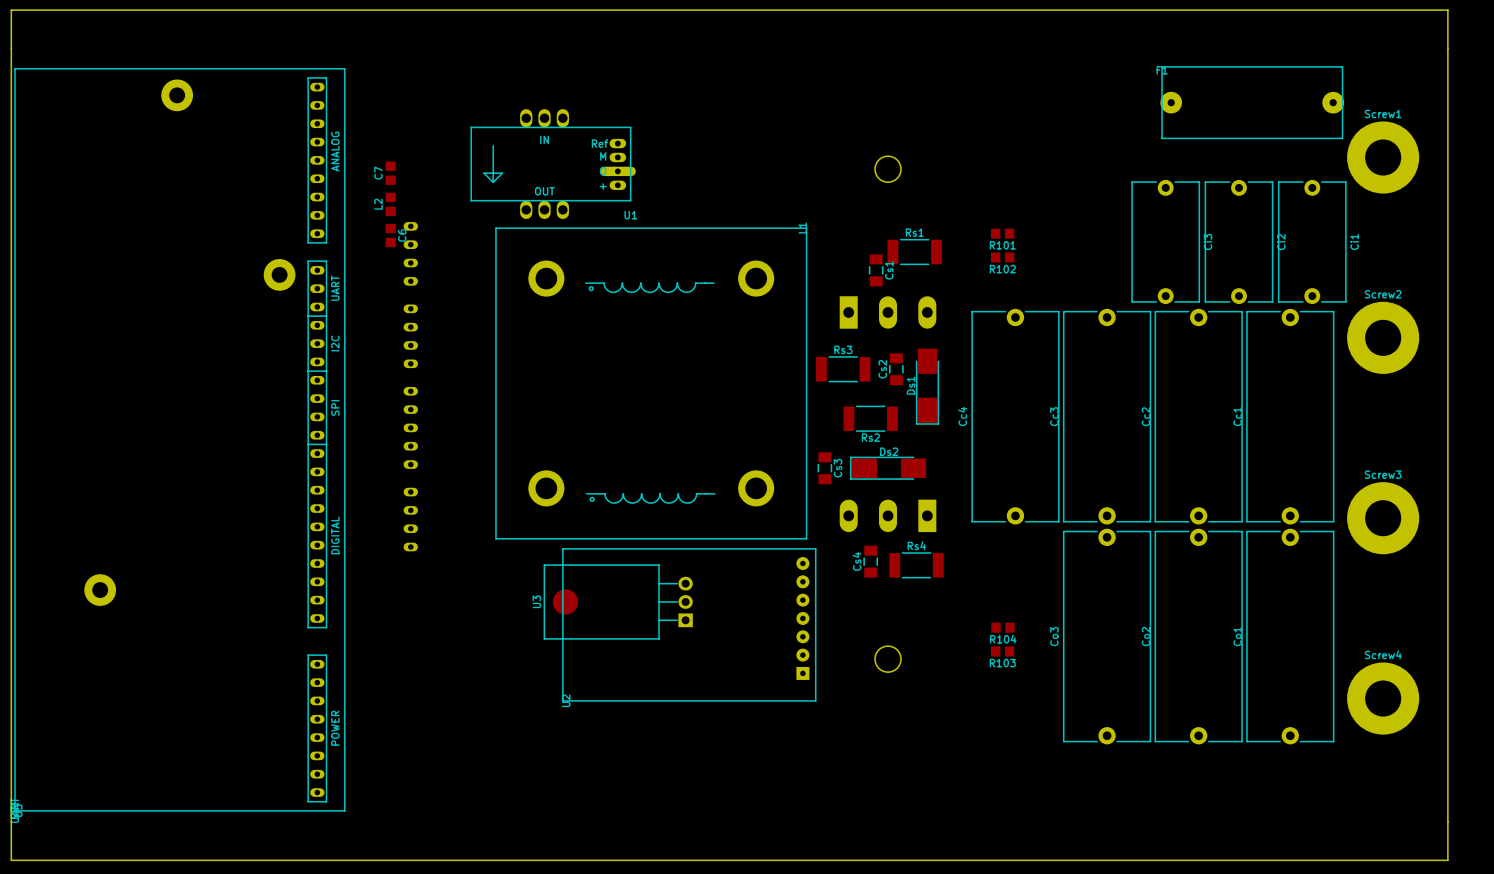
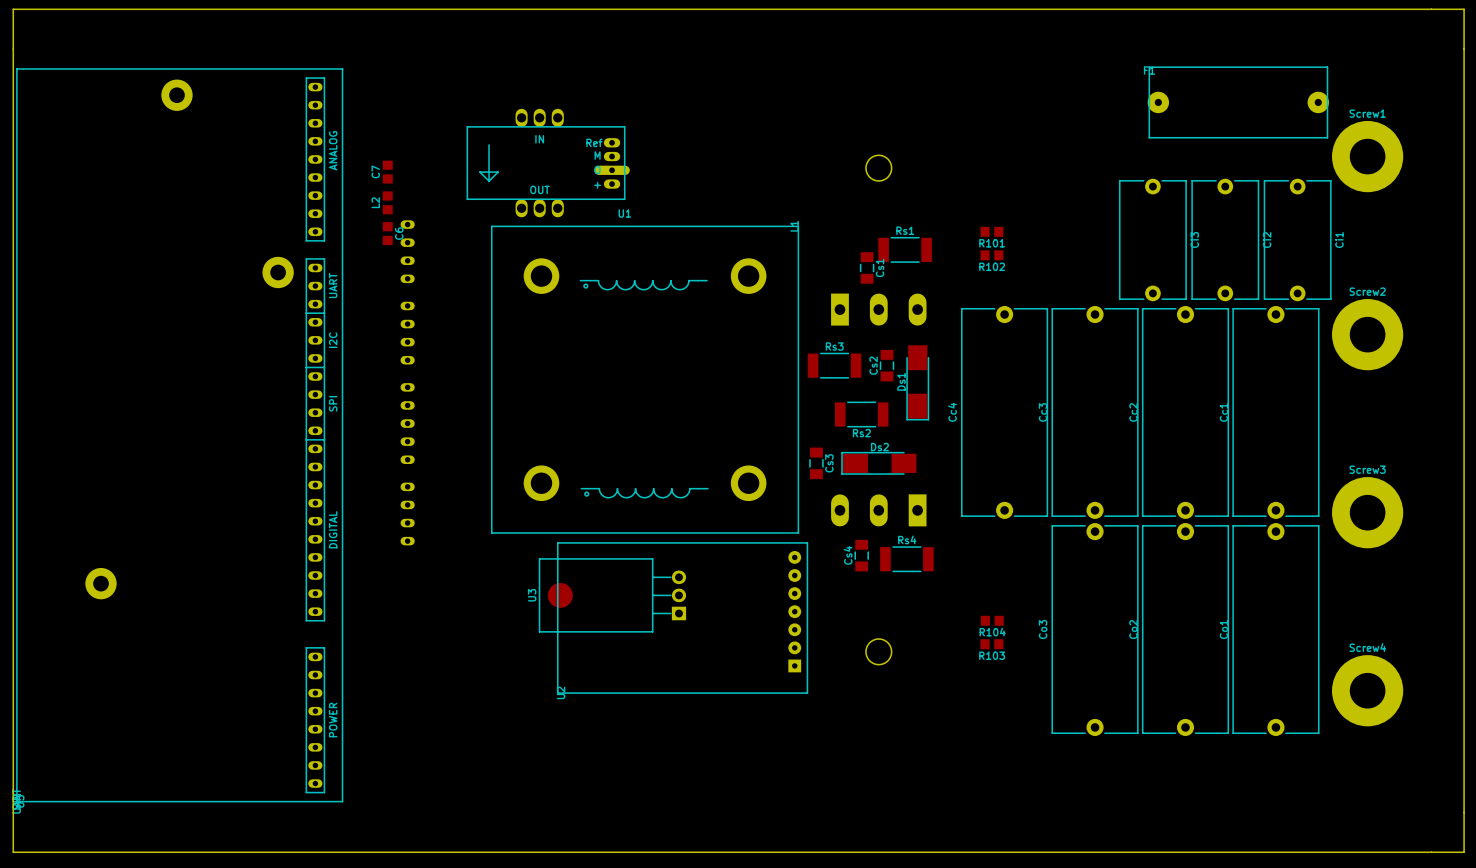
board edge: (11, 10) (1447, 10) (1447, 860) (11, 860) -> (13, 11) (13, 9) (1464, 9) (1464, 852) (13, 852) (13, 850)

